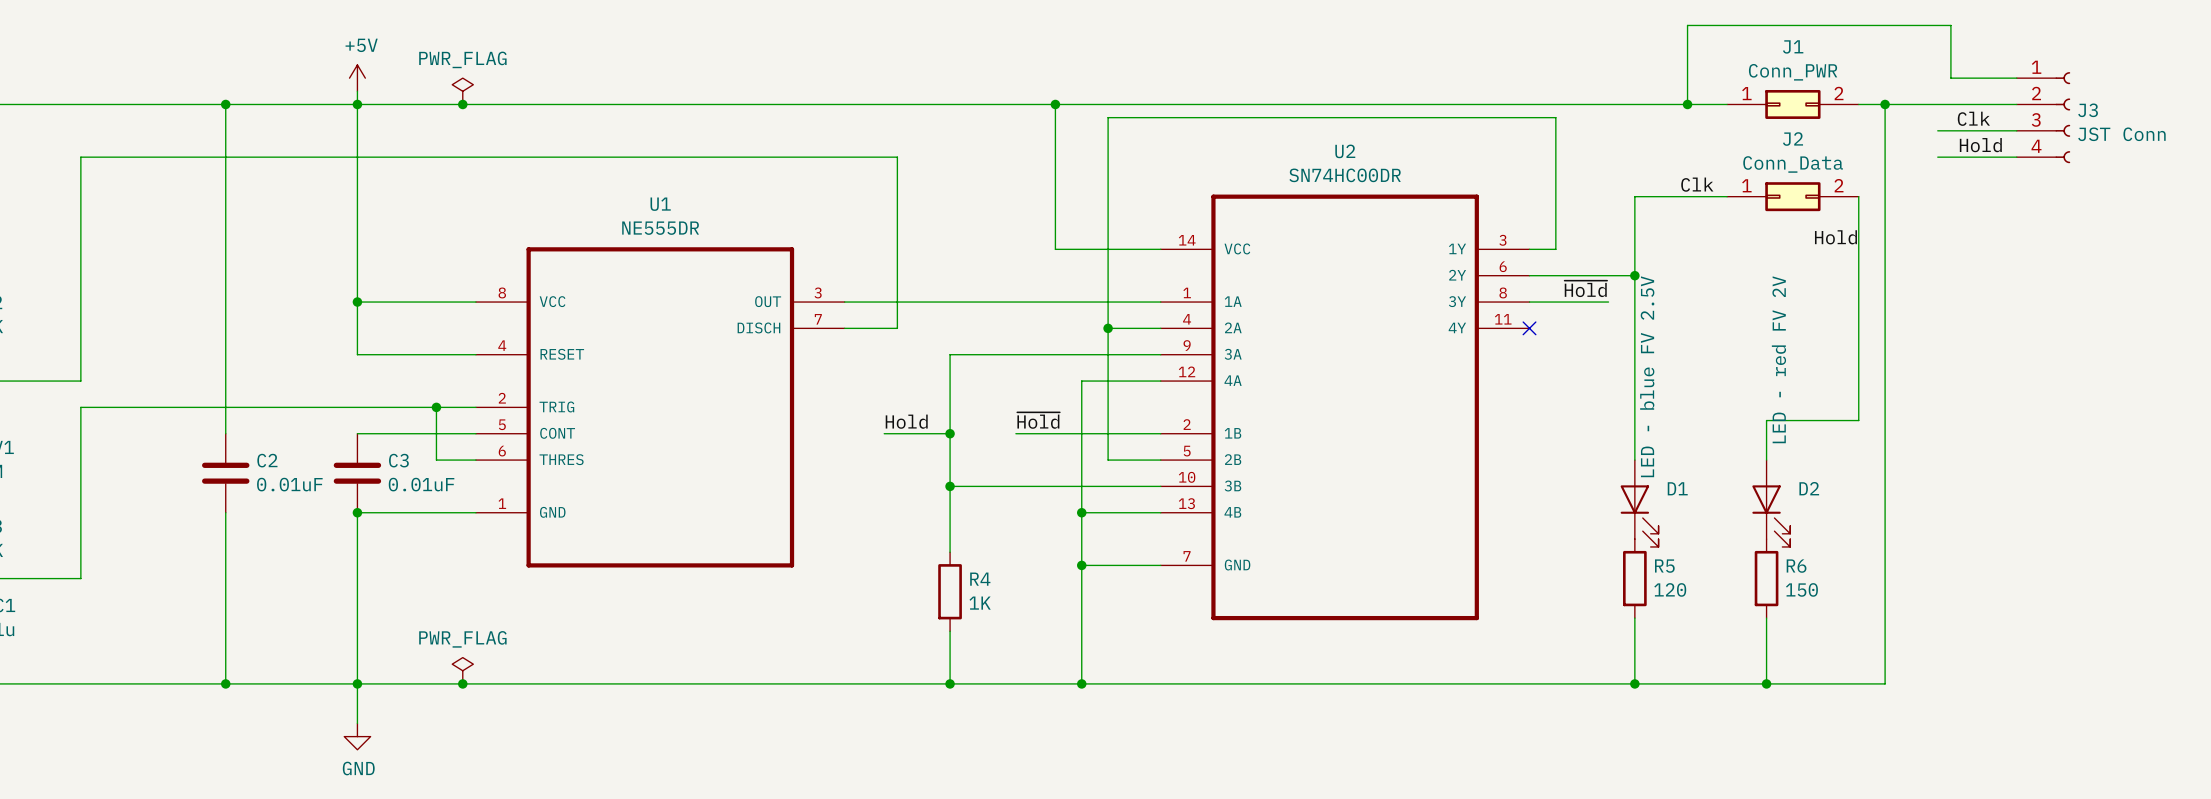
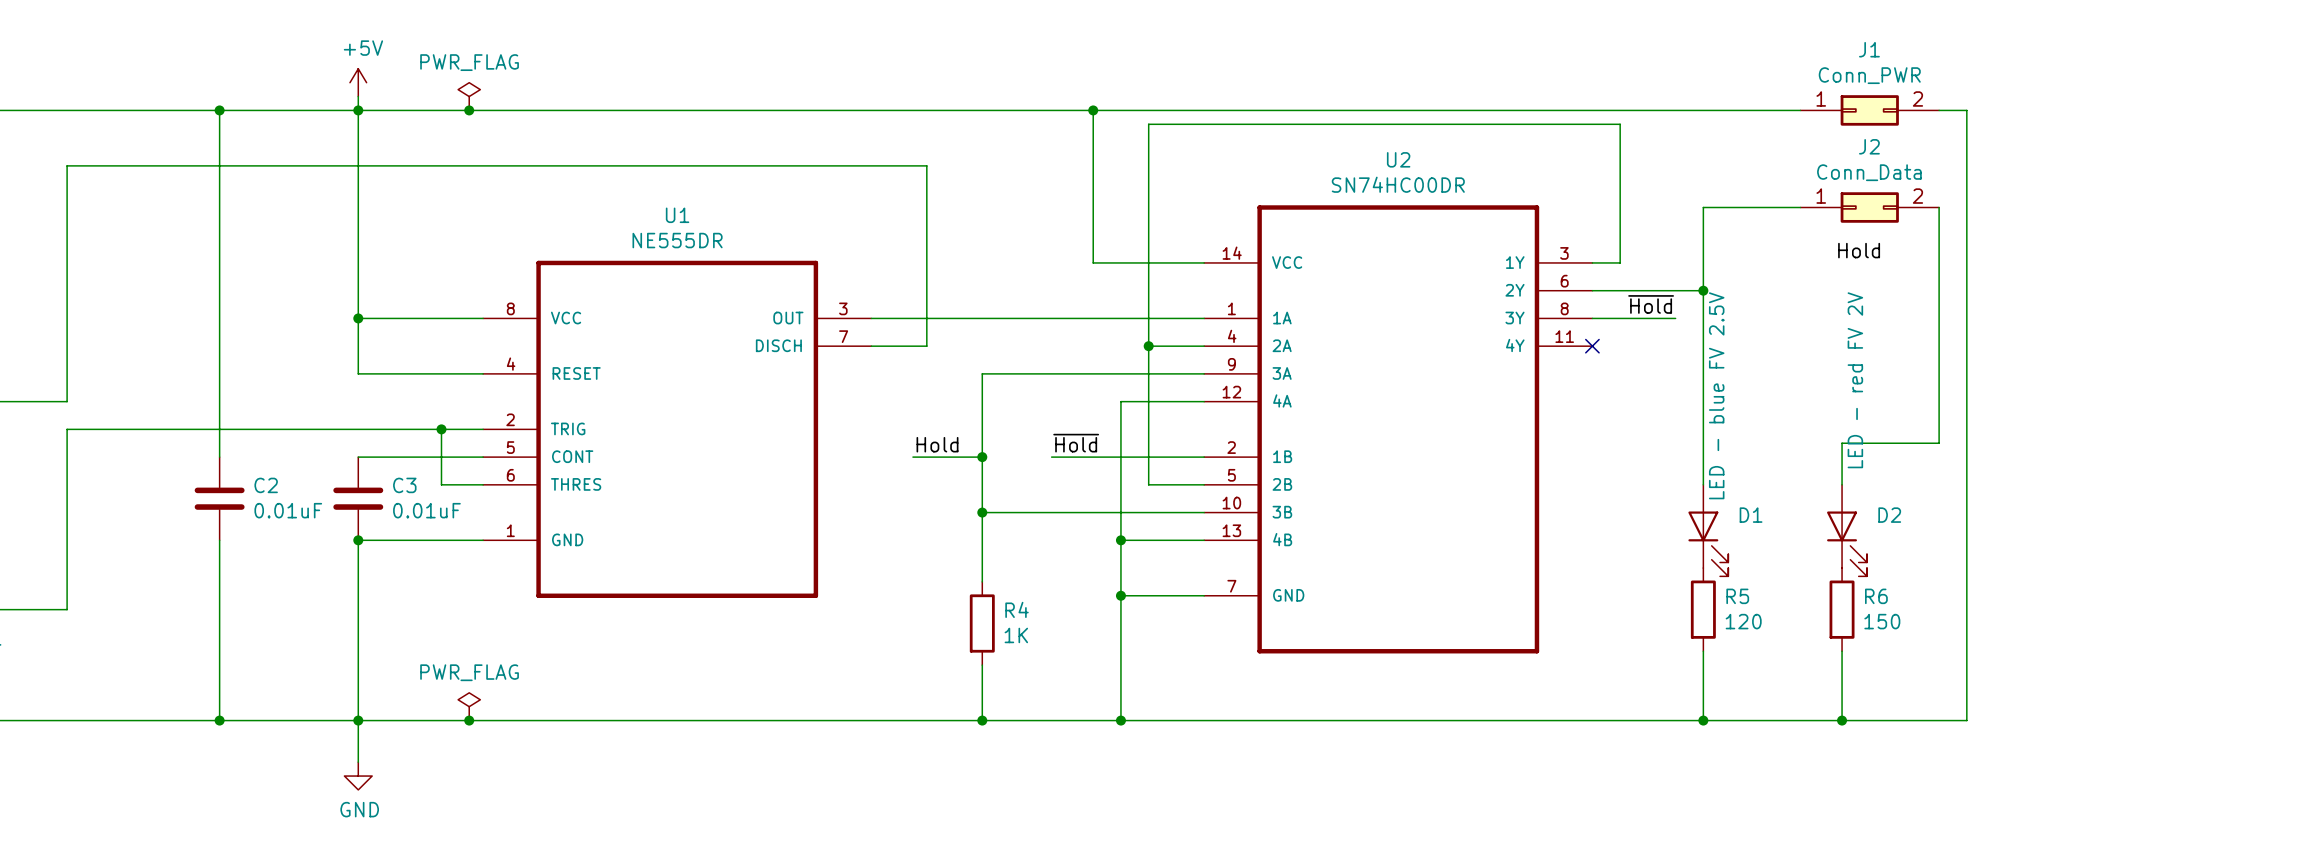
wire: (2016, 78) (1950, 78) (1950, 25) (1687, 25) (1687, 104) -> none
junction: (1687, 104) -> none
wire: (1885, 104) (2016, 104) -> none
junction: (1885, 104) -> none
J3: JST Conn (2043, 117) -> none
label: Clk (1973, 118) -> none
wire: (1937, 130) (2016, 130) -> none
label: Hold (1980, 145) -> none
wire: (1937, 157) (2016, 157) -> none
label: Clk (1697, 184) -> none
label position: Hold (1835, 237) -> Hold (1859, 250)

